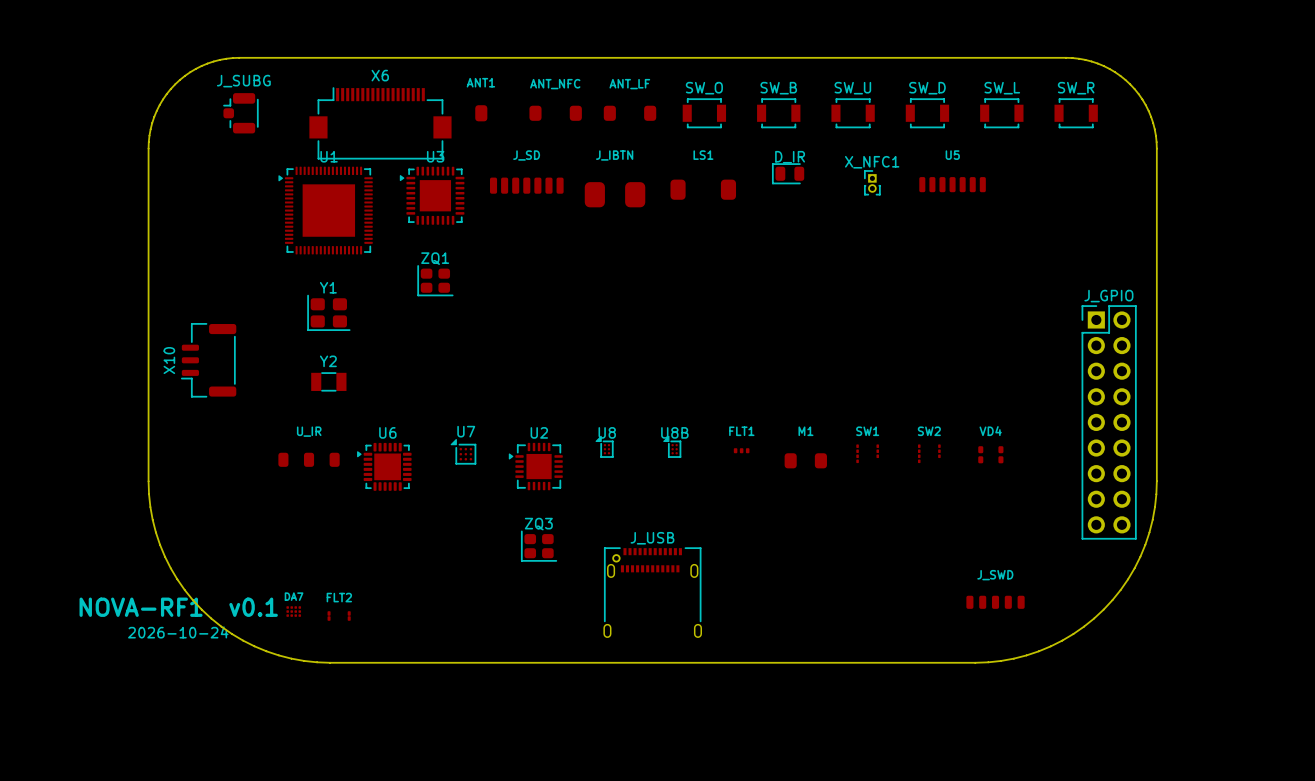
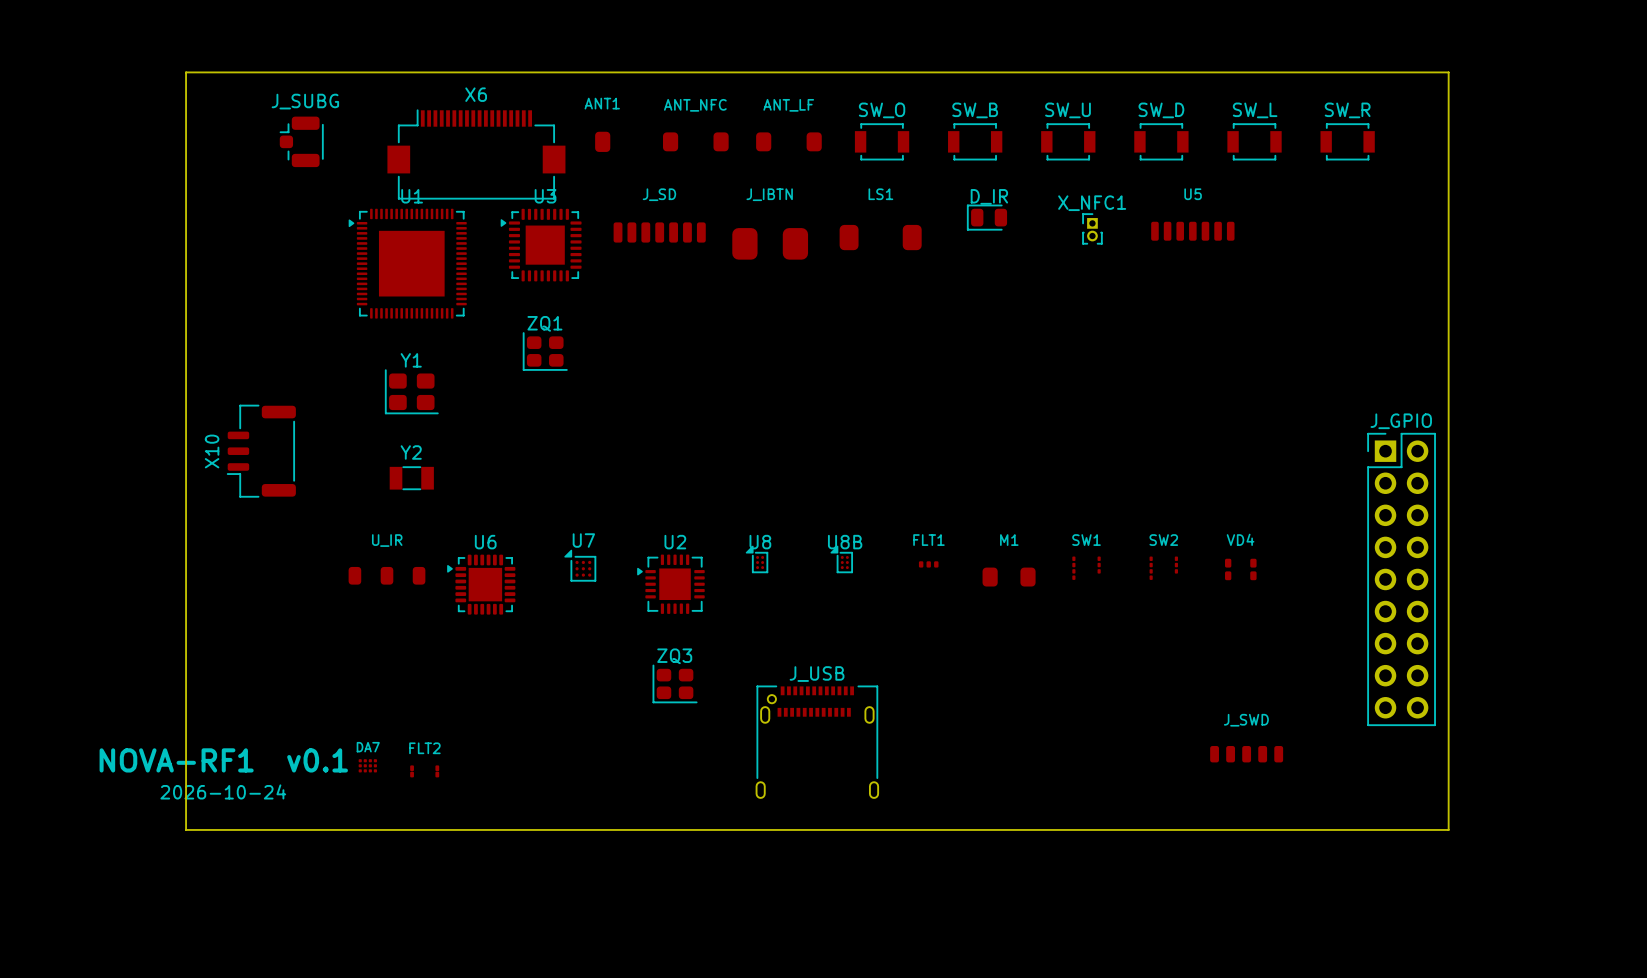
board edge: (239, 57) (207, 63) (190, 72) (175, 84) (162, 99) (154, 116) (148, 148) -> (299, 72) (186, 72) (186, 186)
board edge: (1066, 57) (1097, 63) (1115, 72) (1130, 84) (1142, 99) (1151, 116) (1156, 148) -> (1335, 72) (1448, 72) (1448, 186)
J_GPIO position: (1109, 422) -> (1401, 579)
board edge: (148, 481) (152, 519) (160, 544) (177, 579) (201, 609) (231, 633) (266, 651) (291, 658) (330, 662) -> (186, 602) (186, 829) (413, 829)
board edge: (1156, 481) (1152, 519) (1145, 544) (1128, 579) (1103, 609) (1073, 633) (1038, 651) (1013, 658) (975, 662) -> (1448, 602) (1448, 829) (1221, 829)

